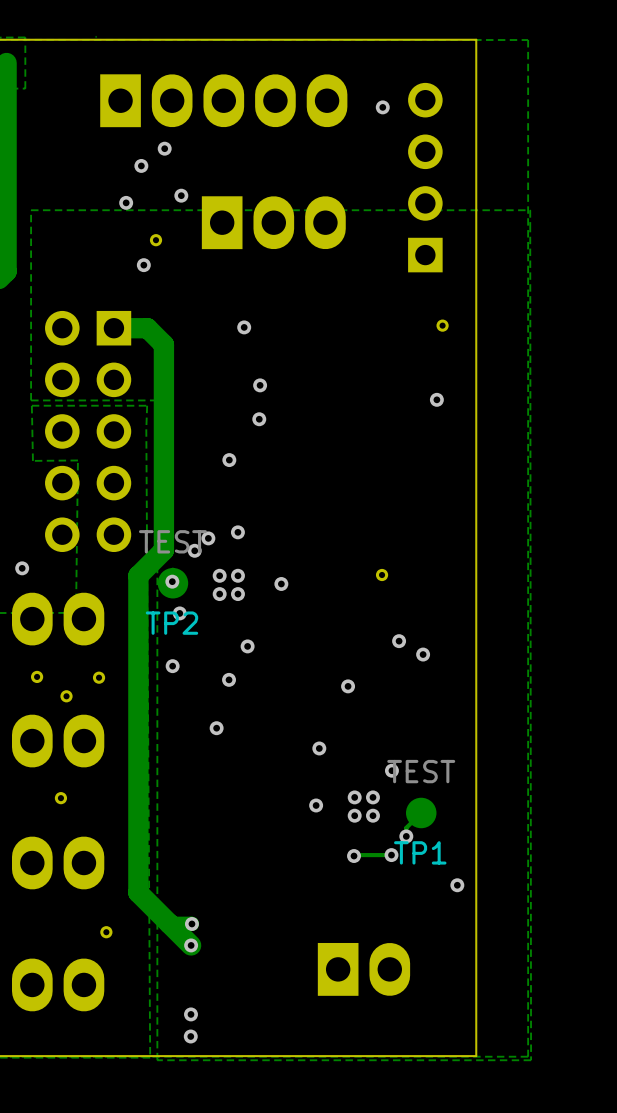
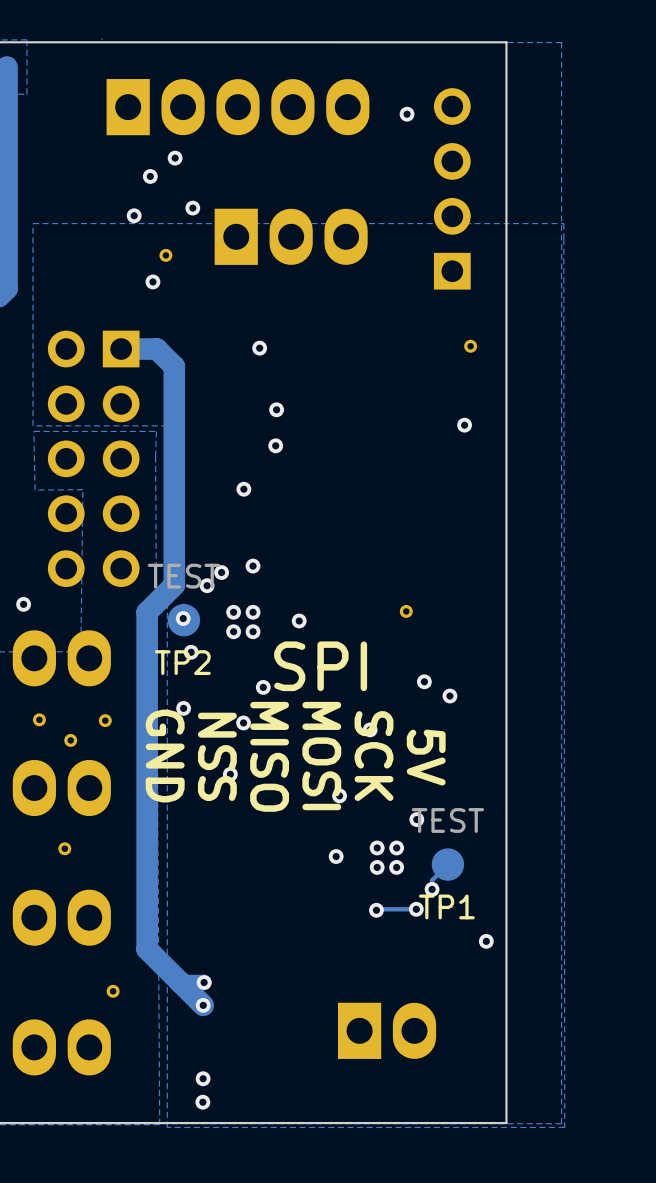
text: none -> SPI (320, 666)
text: none -> GND (165, 756)
text: none -> MOSI (321, 756)
text: none -> SCK (374, 756)
text: none -> NSS (217, 756)
text: none -> MISO (269, 756)
text: none -> 5V (426, 757)

